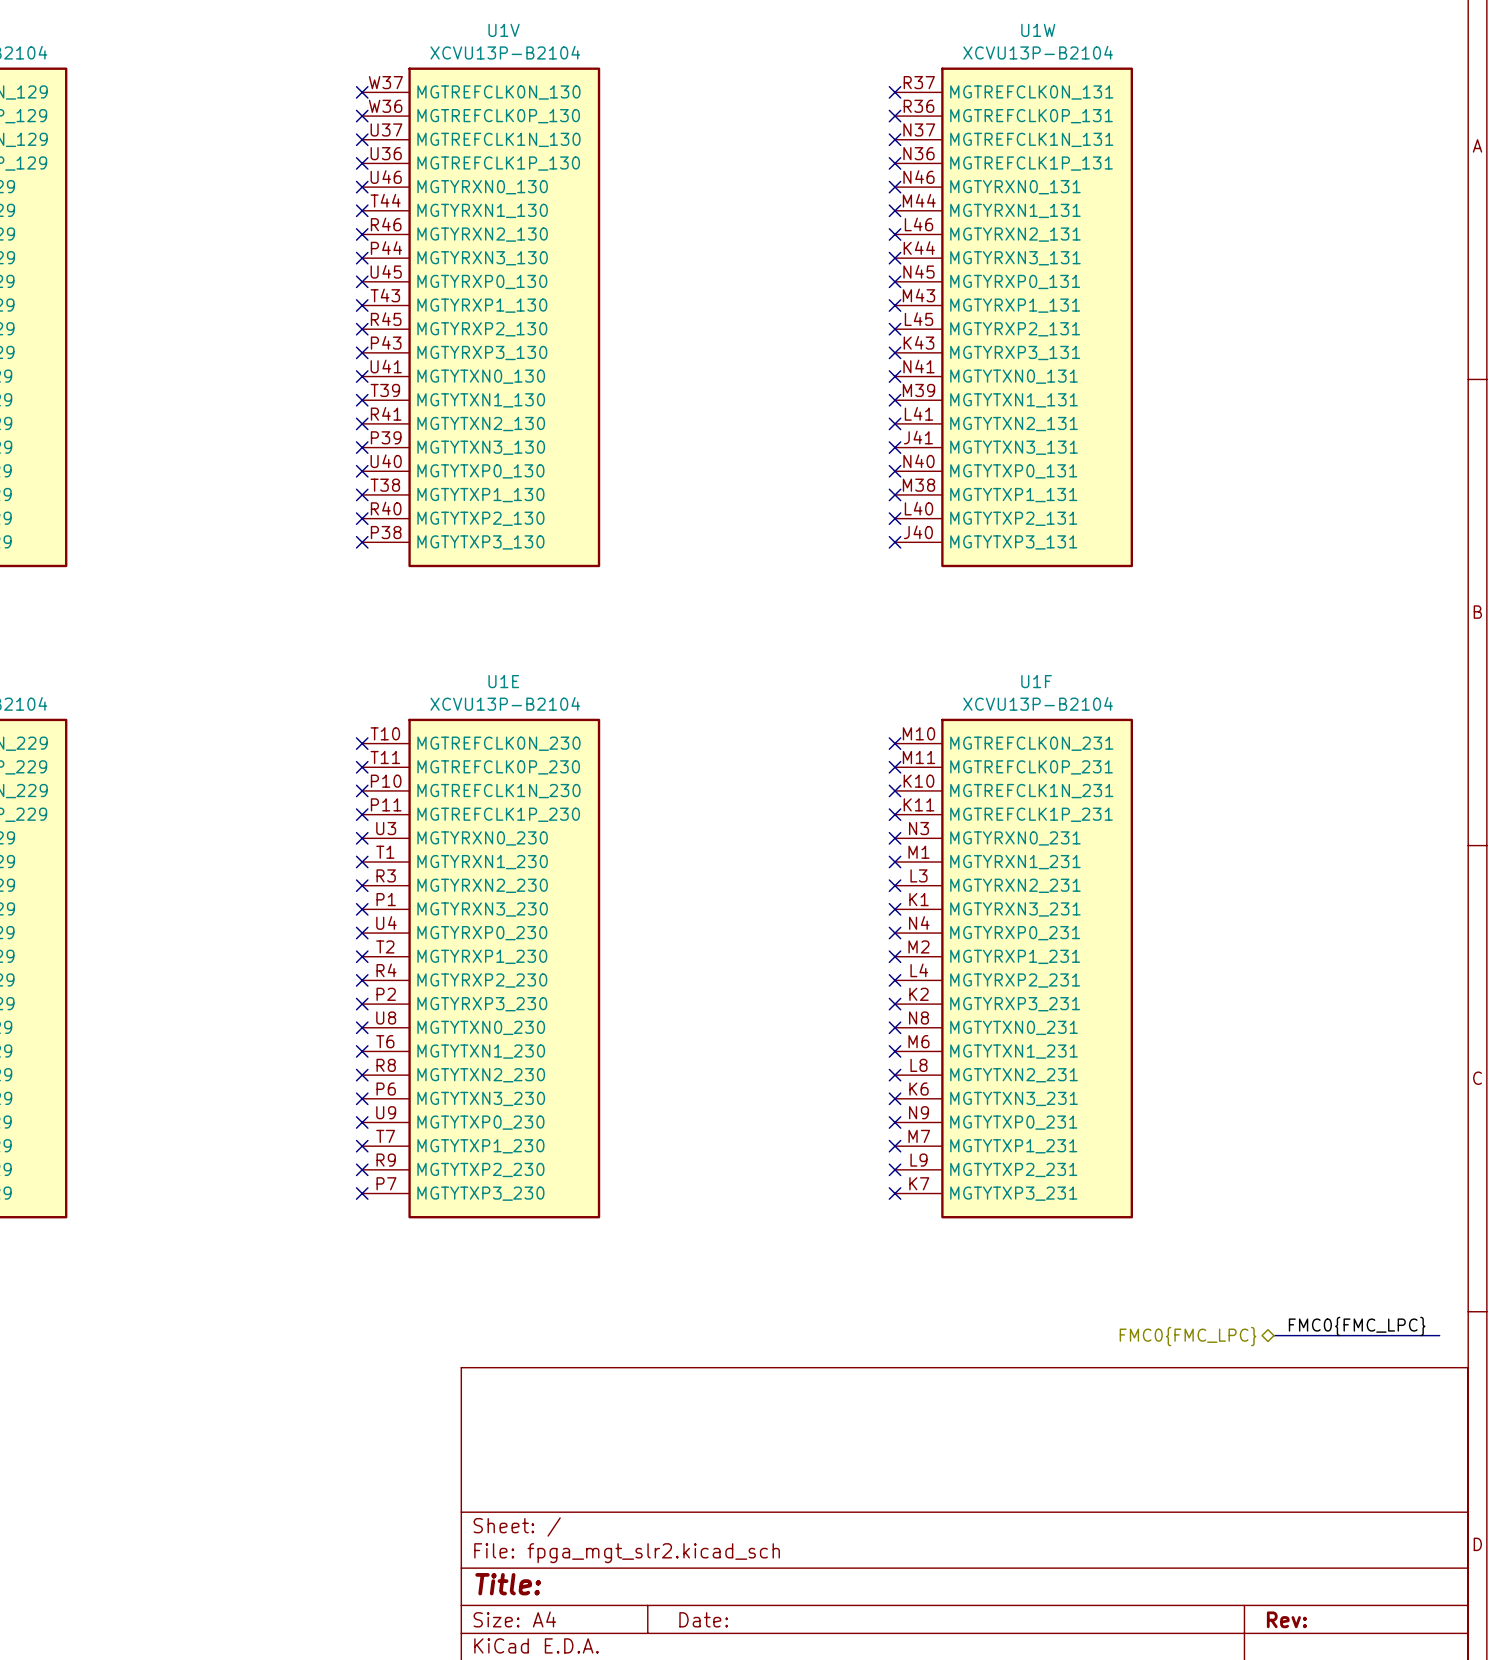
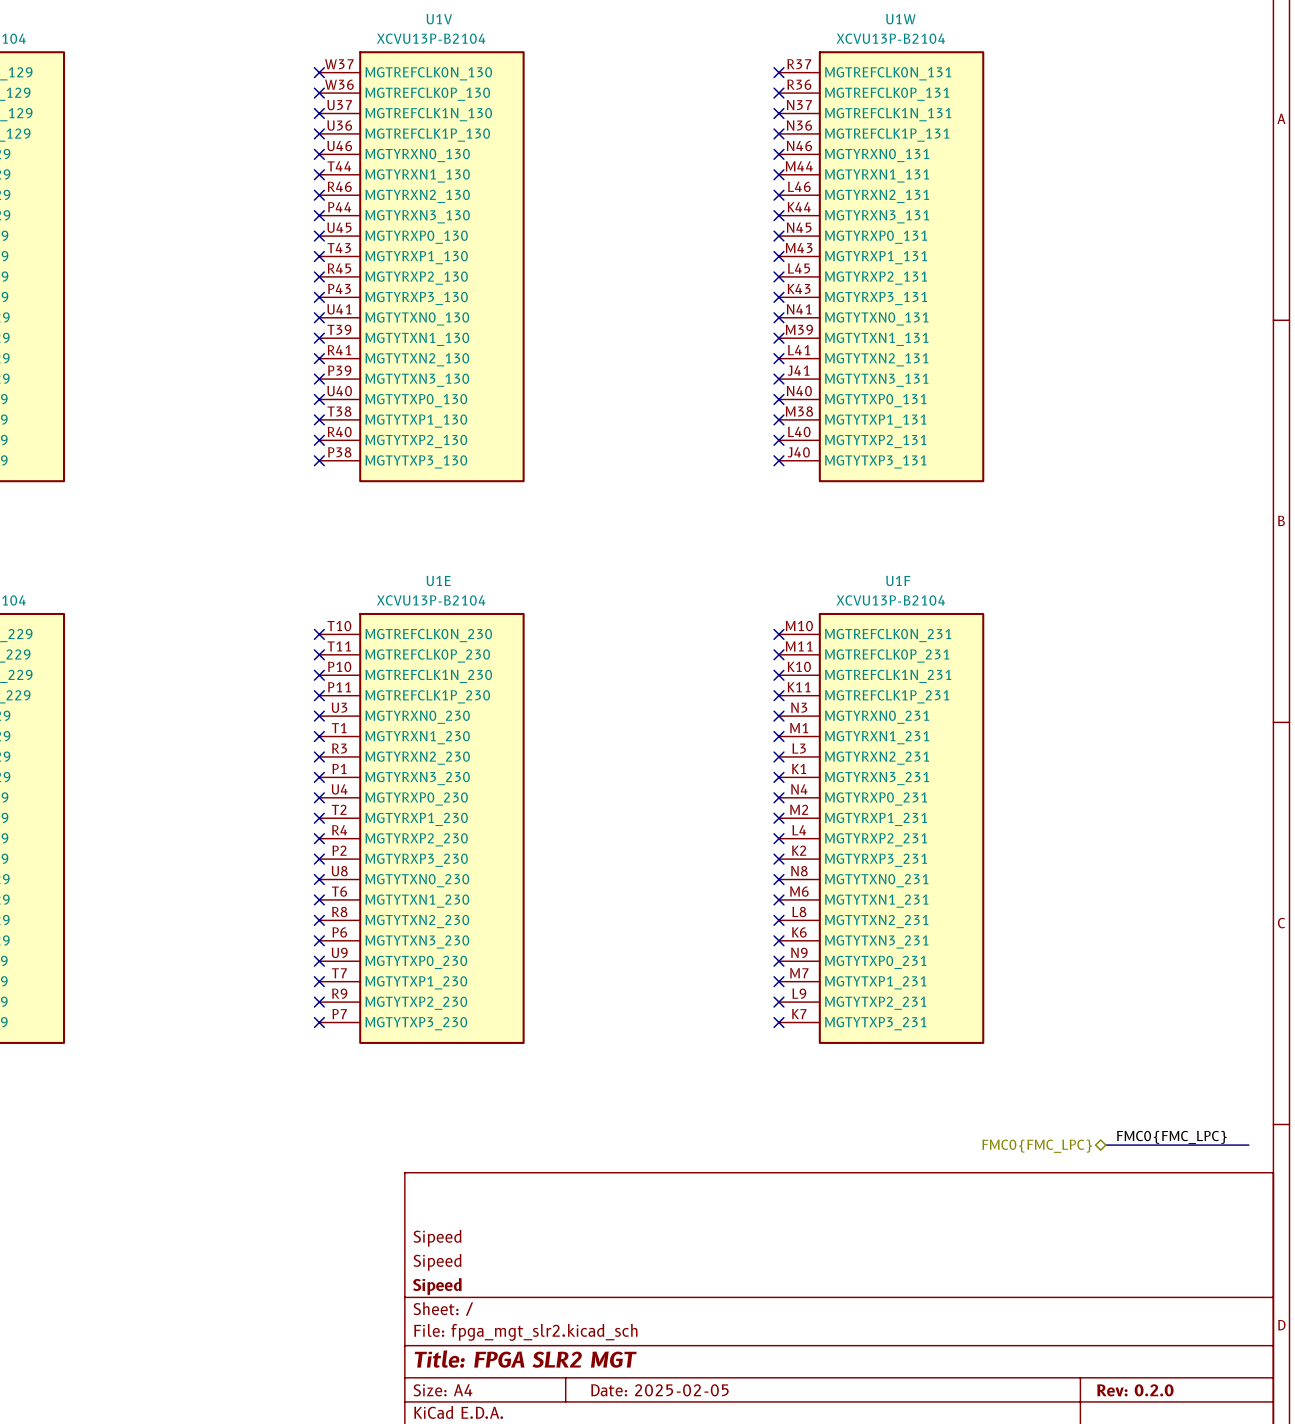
title block: none -> Sipeed (437, 1238)
title block: none -> Sipeed (437, 1262)
title block: none -> Sipeed (437, 1286)
title block: Title: (508, 1584) -> Title: FPGA SLR2 MGT (525, 1359)
title block: Date: (703, 1619) -> Date: 2025-02-05 (659, 1390)
title block: Rev: (1286, 1619) -> Rev: 0.2.0 (1135, 1390)

